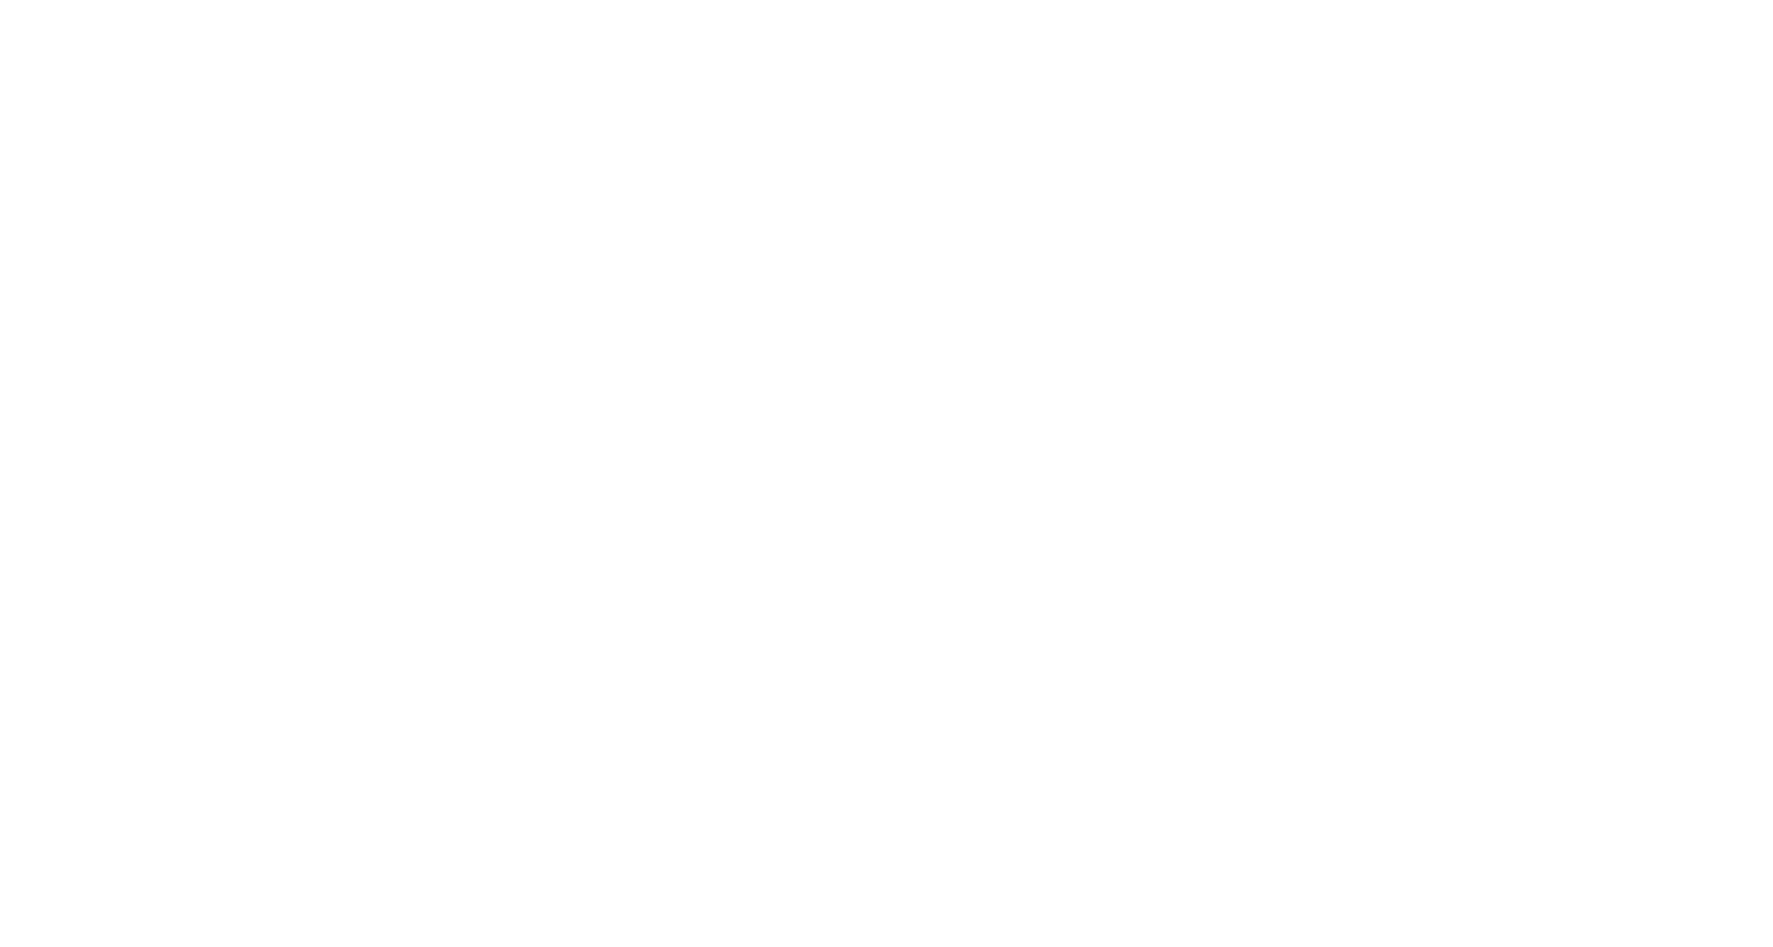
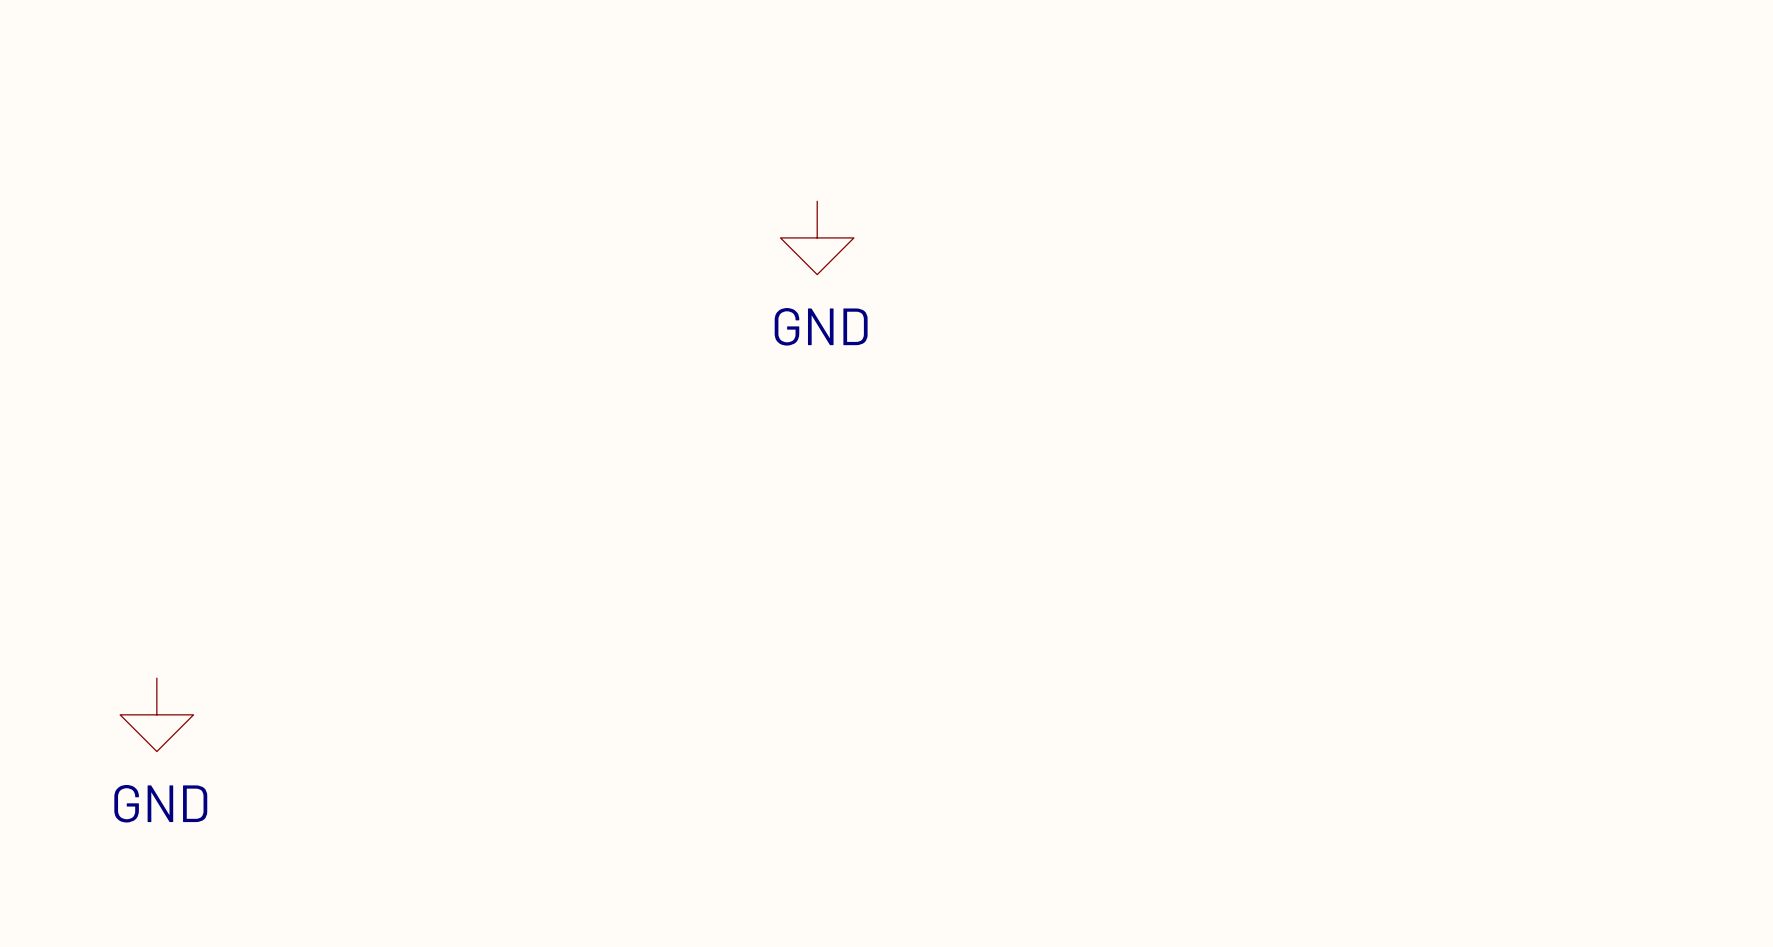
power symbol: none -> GND (817, 237)
power symbol: none -> GND (156, 714)

